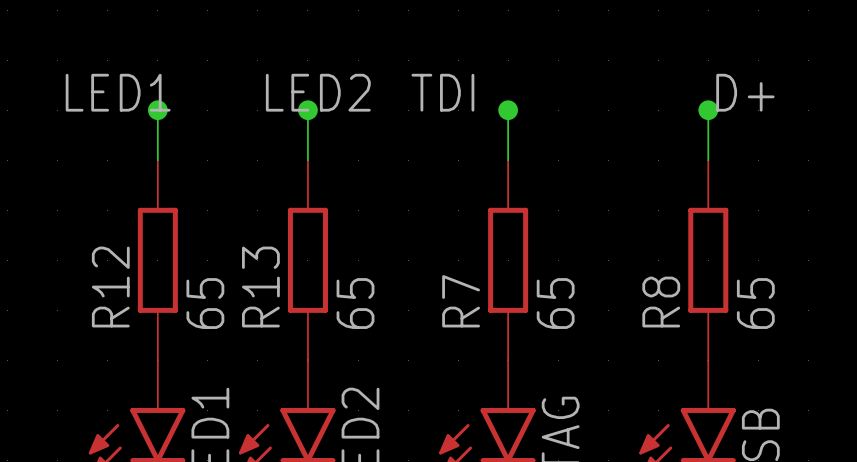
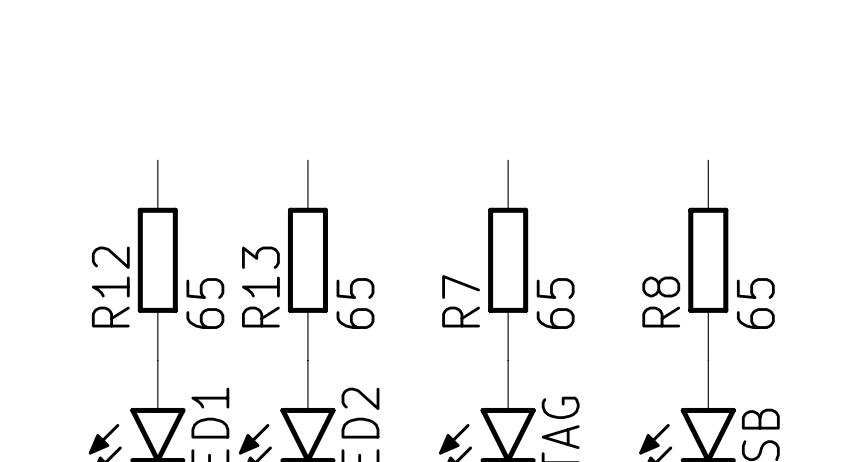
label: LED1 (118, 92) -> none
label: LED2 (318, 92) -> none
label: TDI (442, 92) -> none
label: D+ (745, 92) -> none
wire: (157, 110) (157, 160) -> none
junction: (157, 110) -> none
wire: (307, 110) (307, 160) -> none
junction: (307, 110) -> none
wire: (508, 110) (508, 160) -> none
junction: (508, 110) -> none
wire: (708, 110) (708, 160) -> none
junction: (708, 110) -> none

